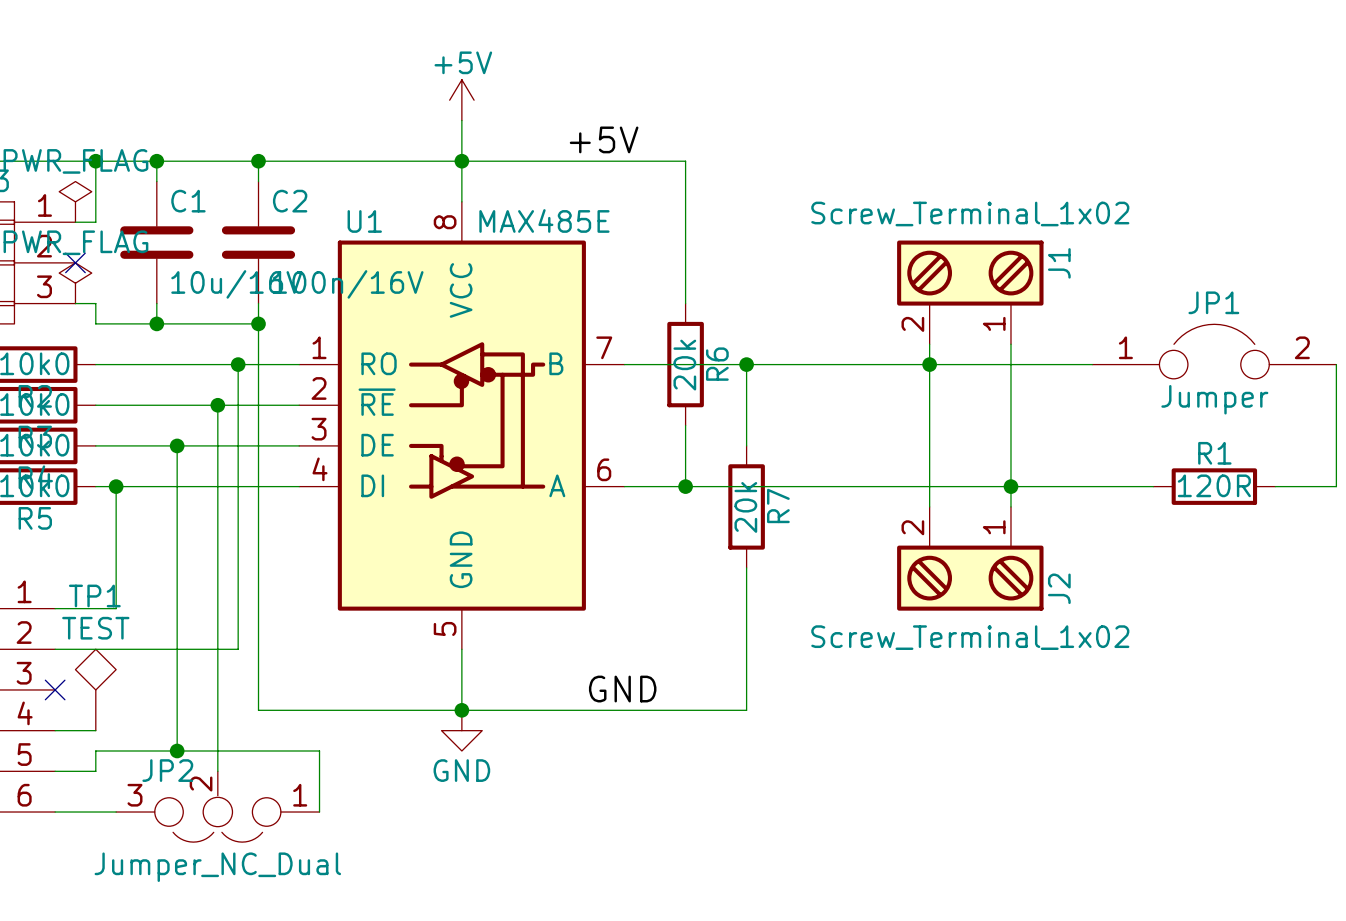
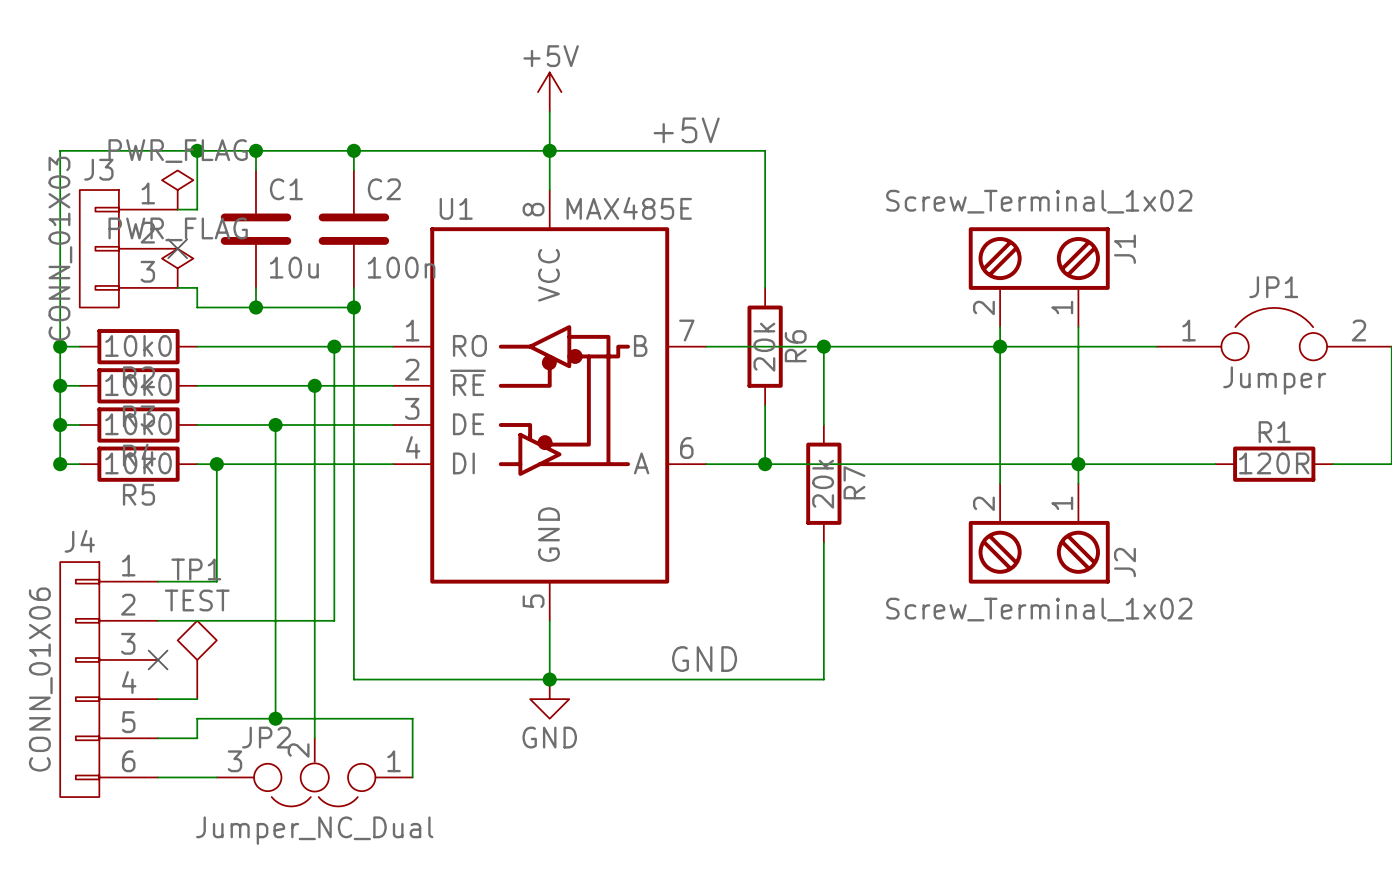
C1 value: 10u/16V (236, 284) -> 10u (294, 267)
C2 value: 100n/16V (348, 284) -> 100n (401, 267)

